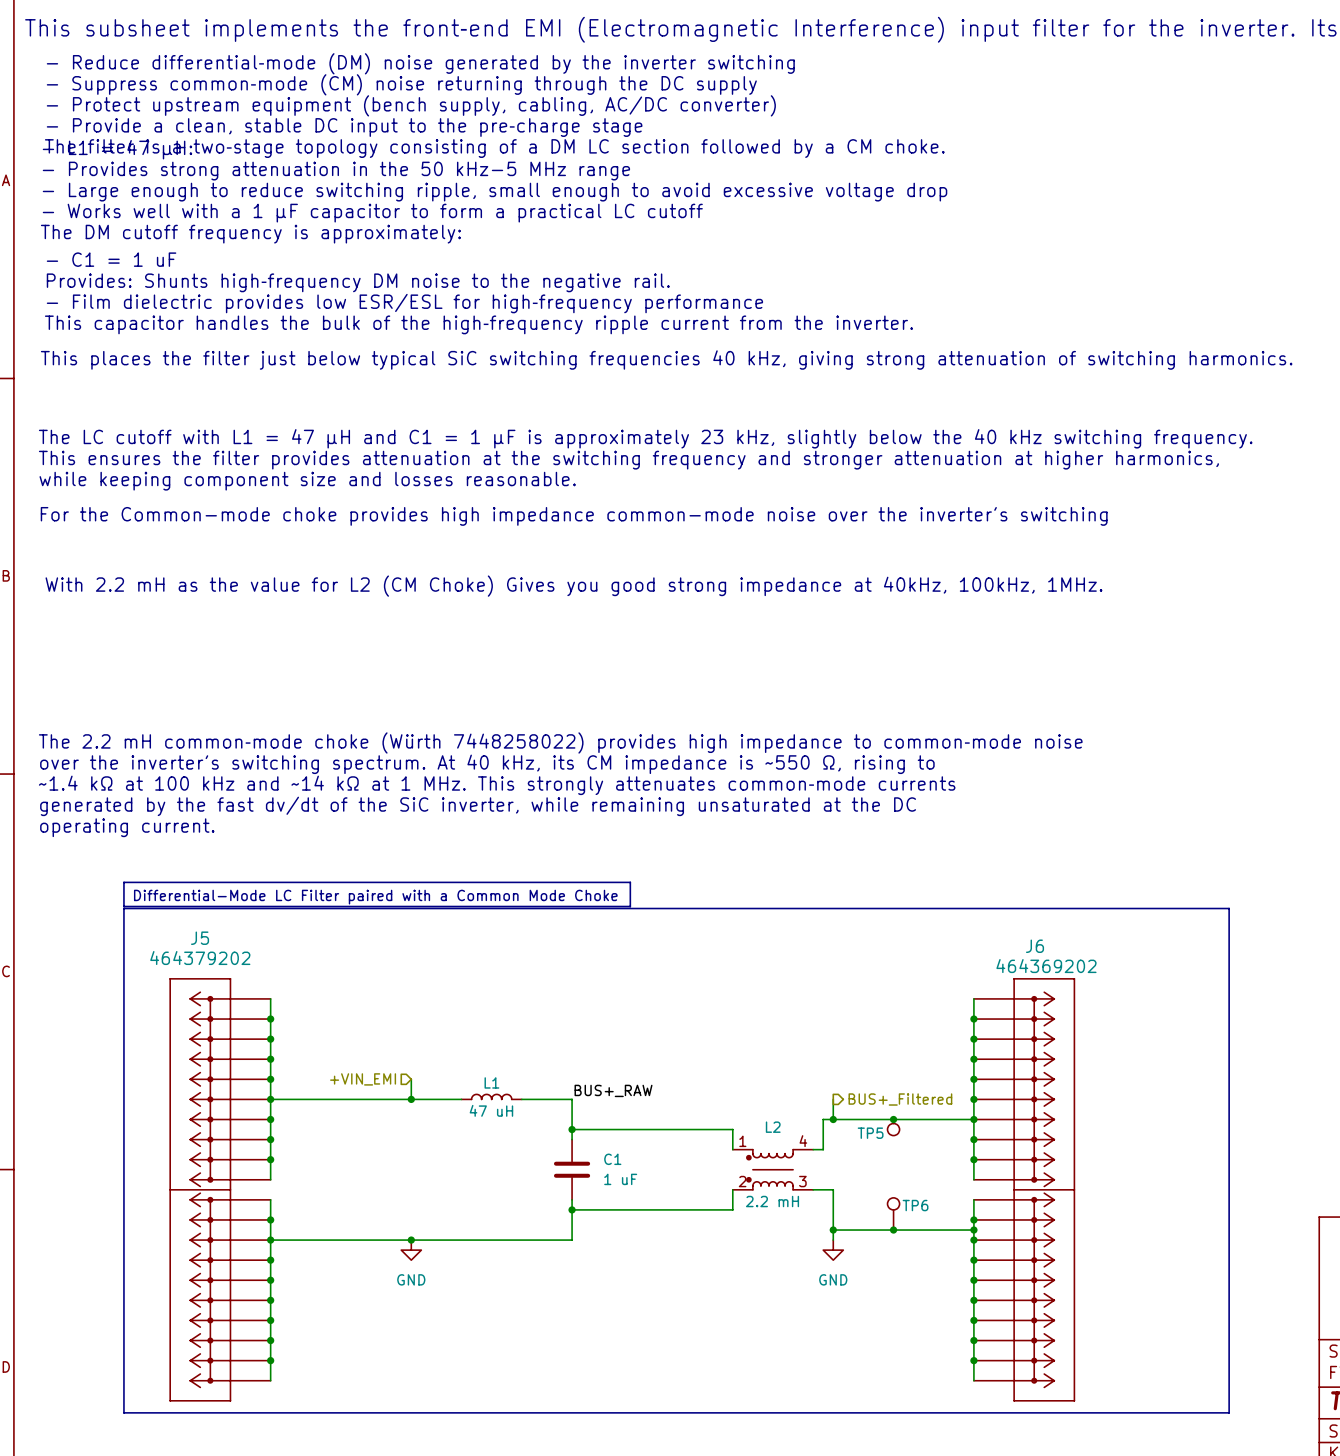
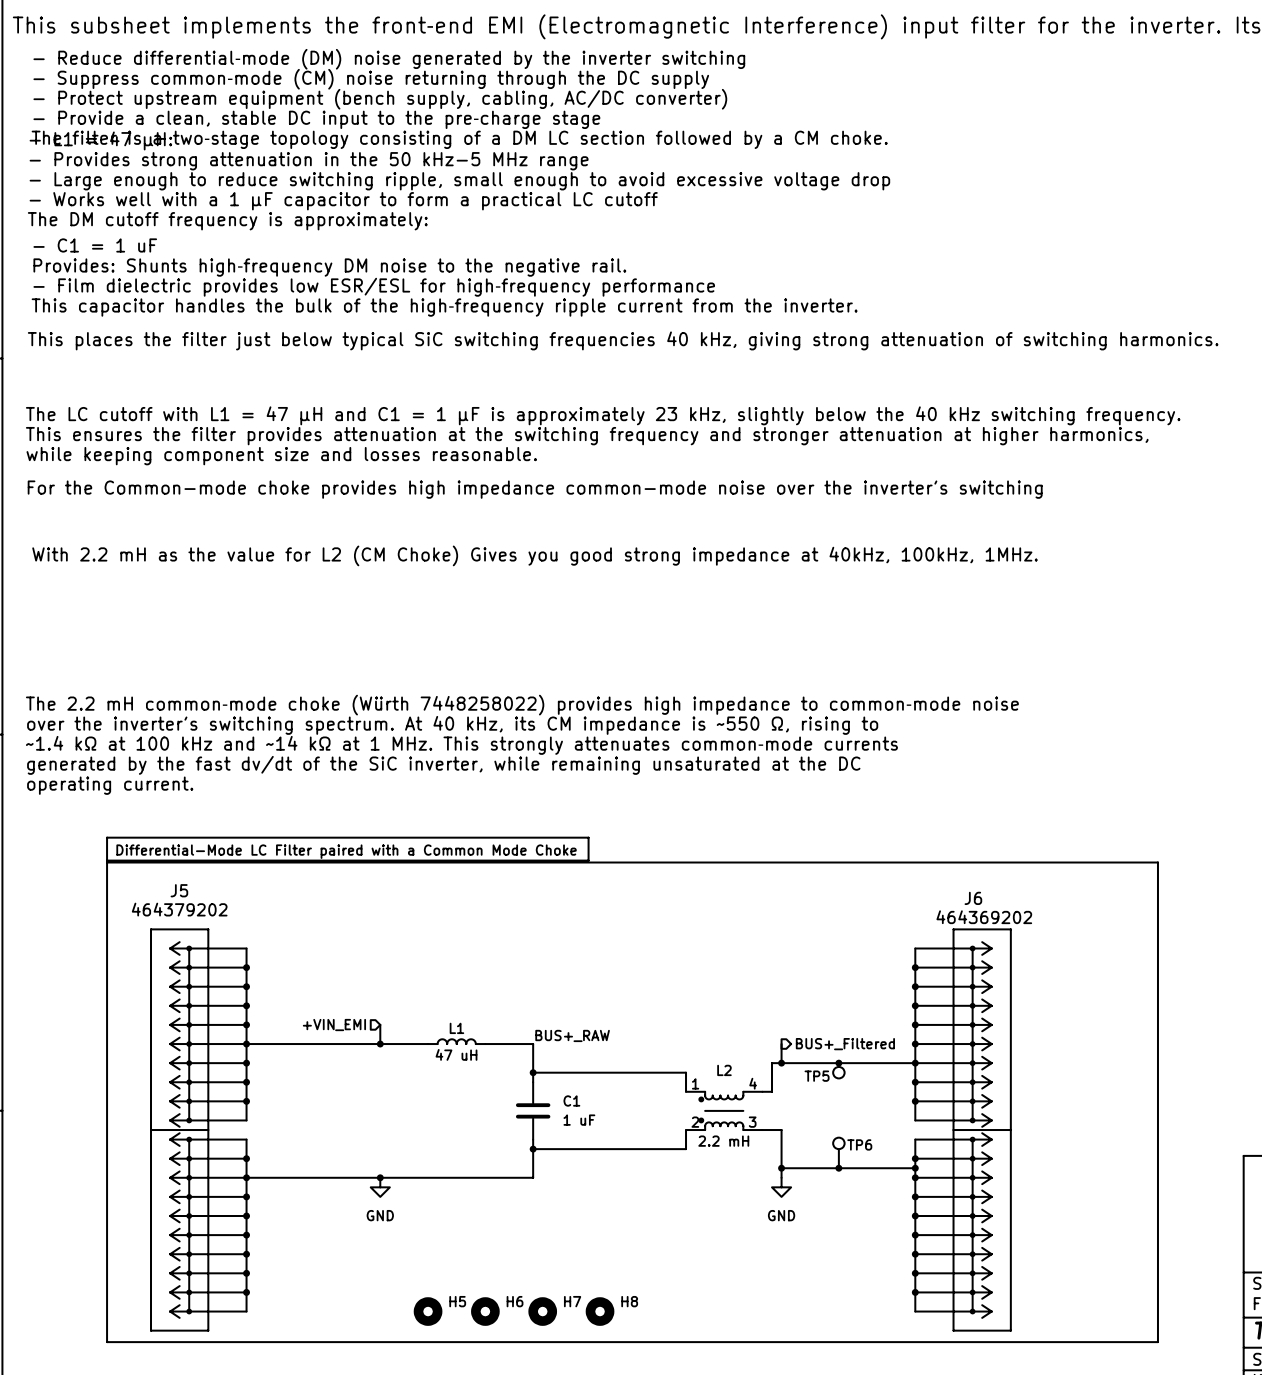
H5: none -> (428, 1311)
H6: none -> (485, 1311)
H7: none -> (542, 1311)
H8: none -> (600, 1311)

